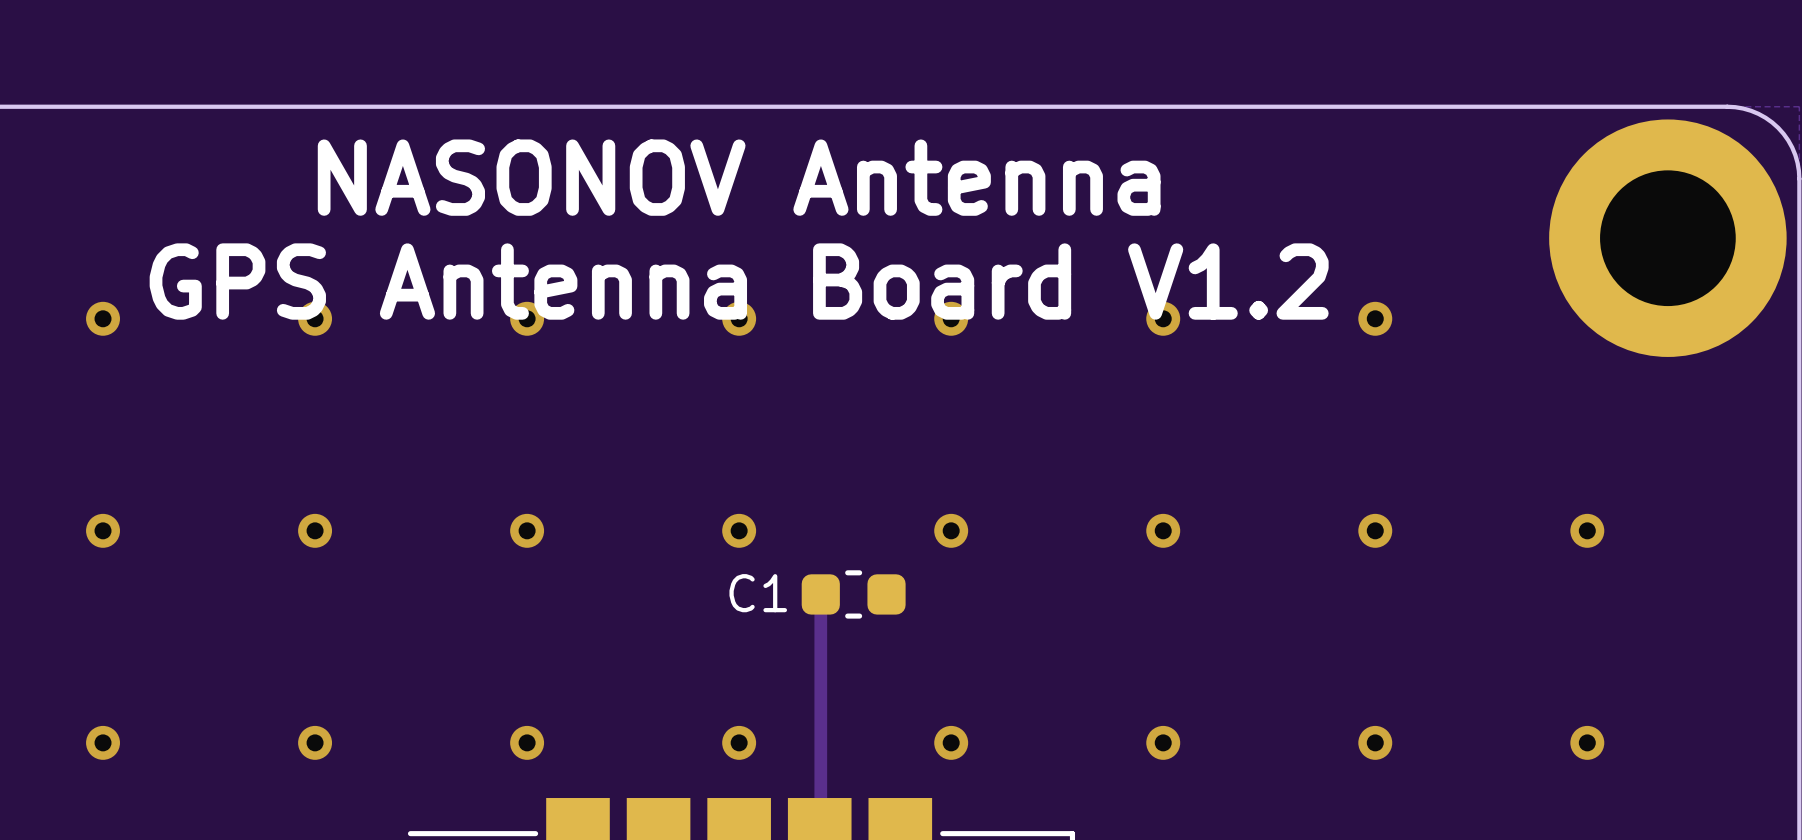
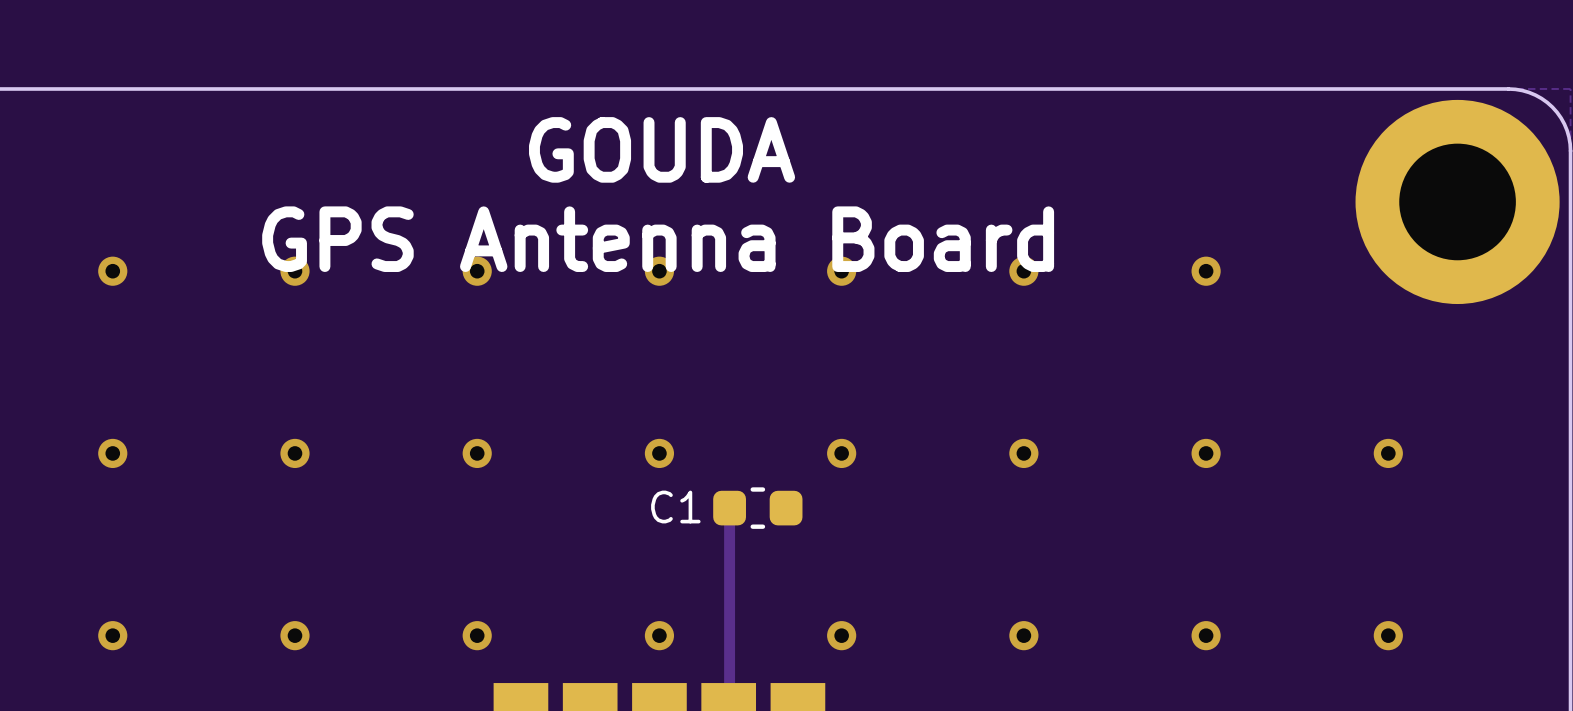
text: NASONOV Antenna (739, 177) -> GOUDA (662, 149)
text: GPS Antenna Board V1.2 (739, 281) -> GPS Antenna Board (658, 239)

